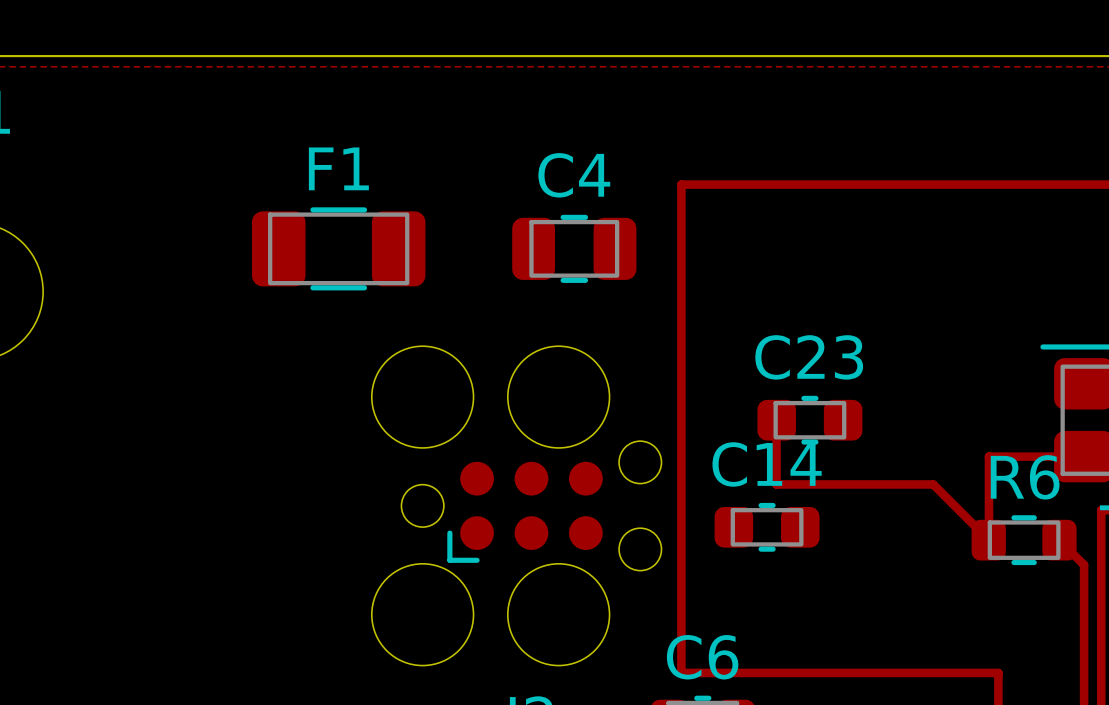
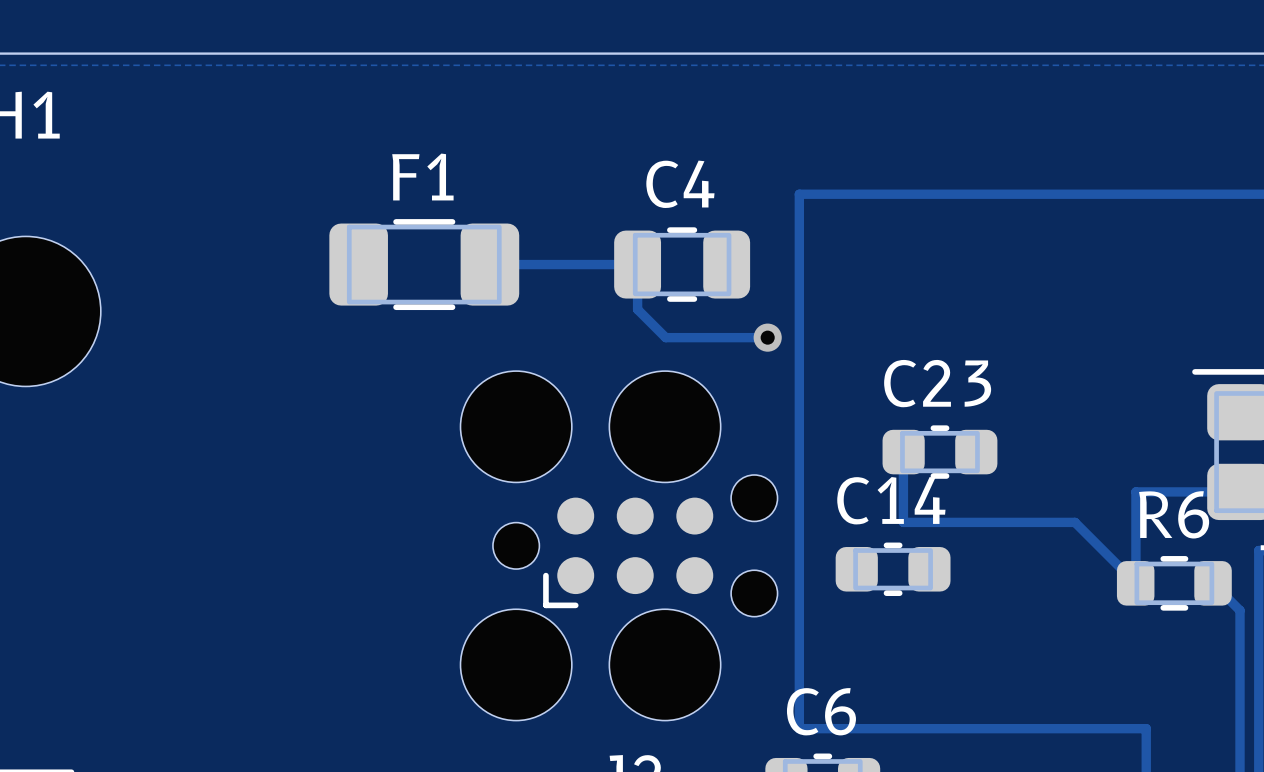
track: none -> (489, 264) (637, 264) (637, 309) (665, 337) (767, 337)
via: none -> (767, 337)

